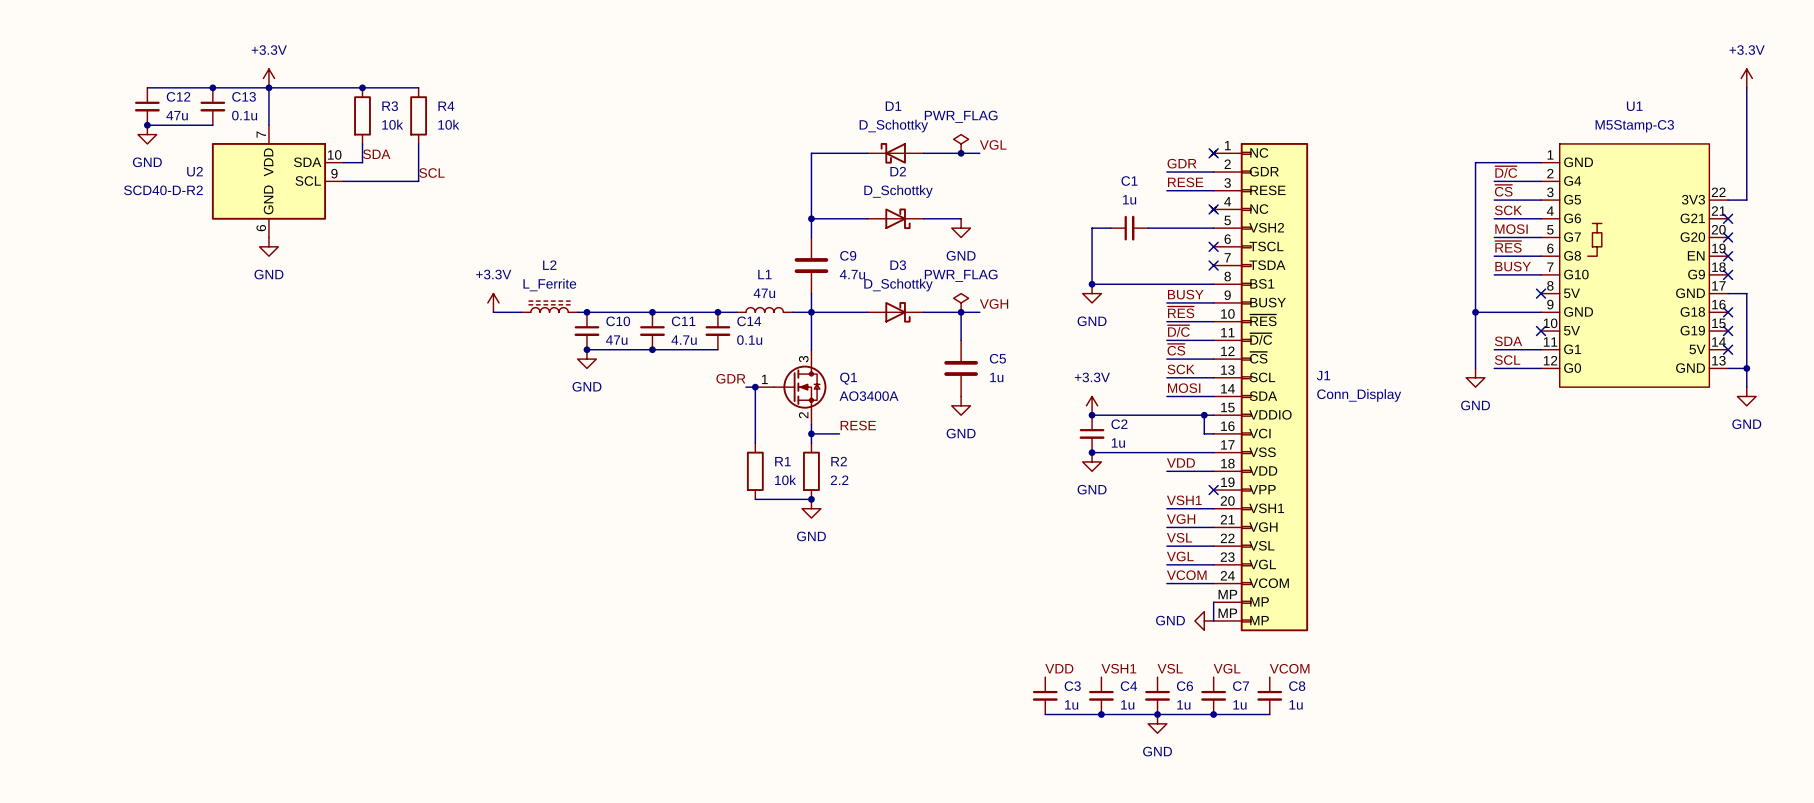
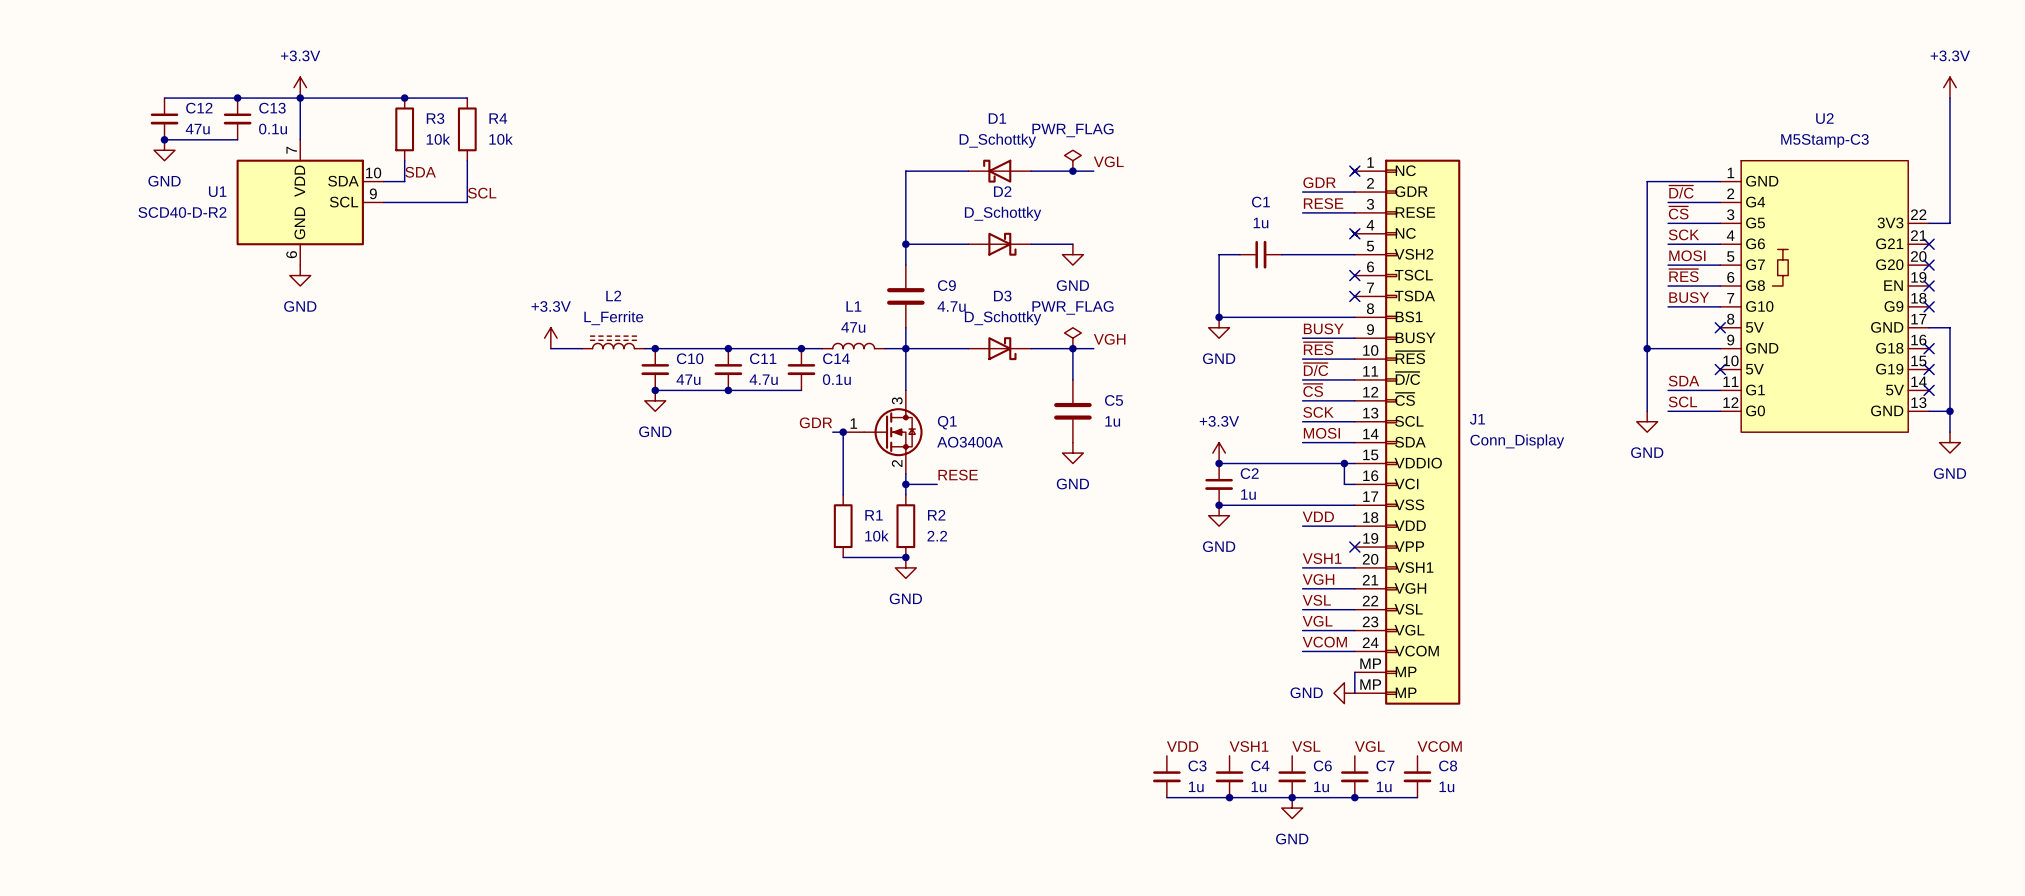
U1 name: U1 (1634, 106) -> U2 (1824, 118)
U2 name: U2 (194, 171) -> U1 (217, 191)

